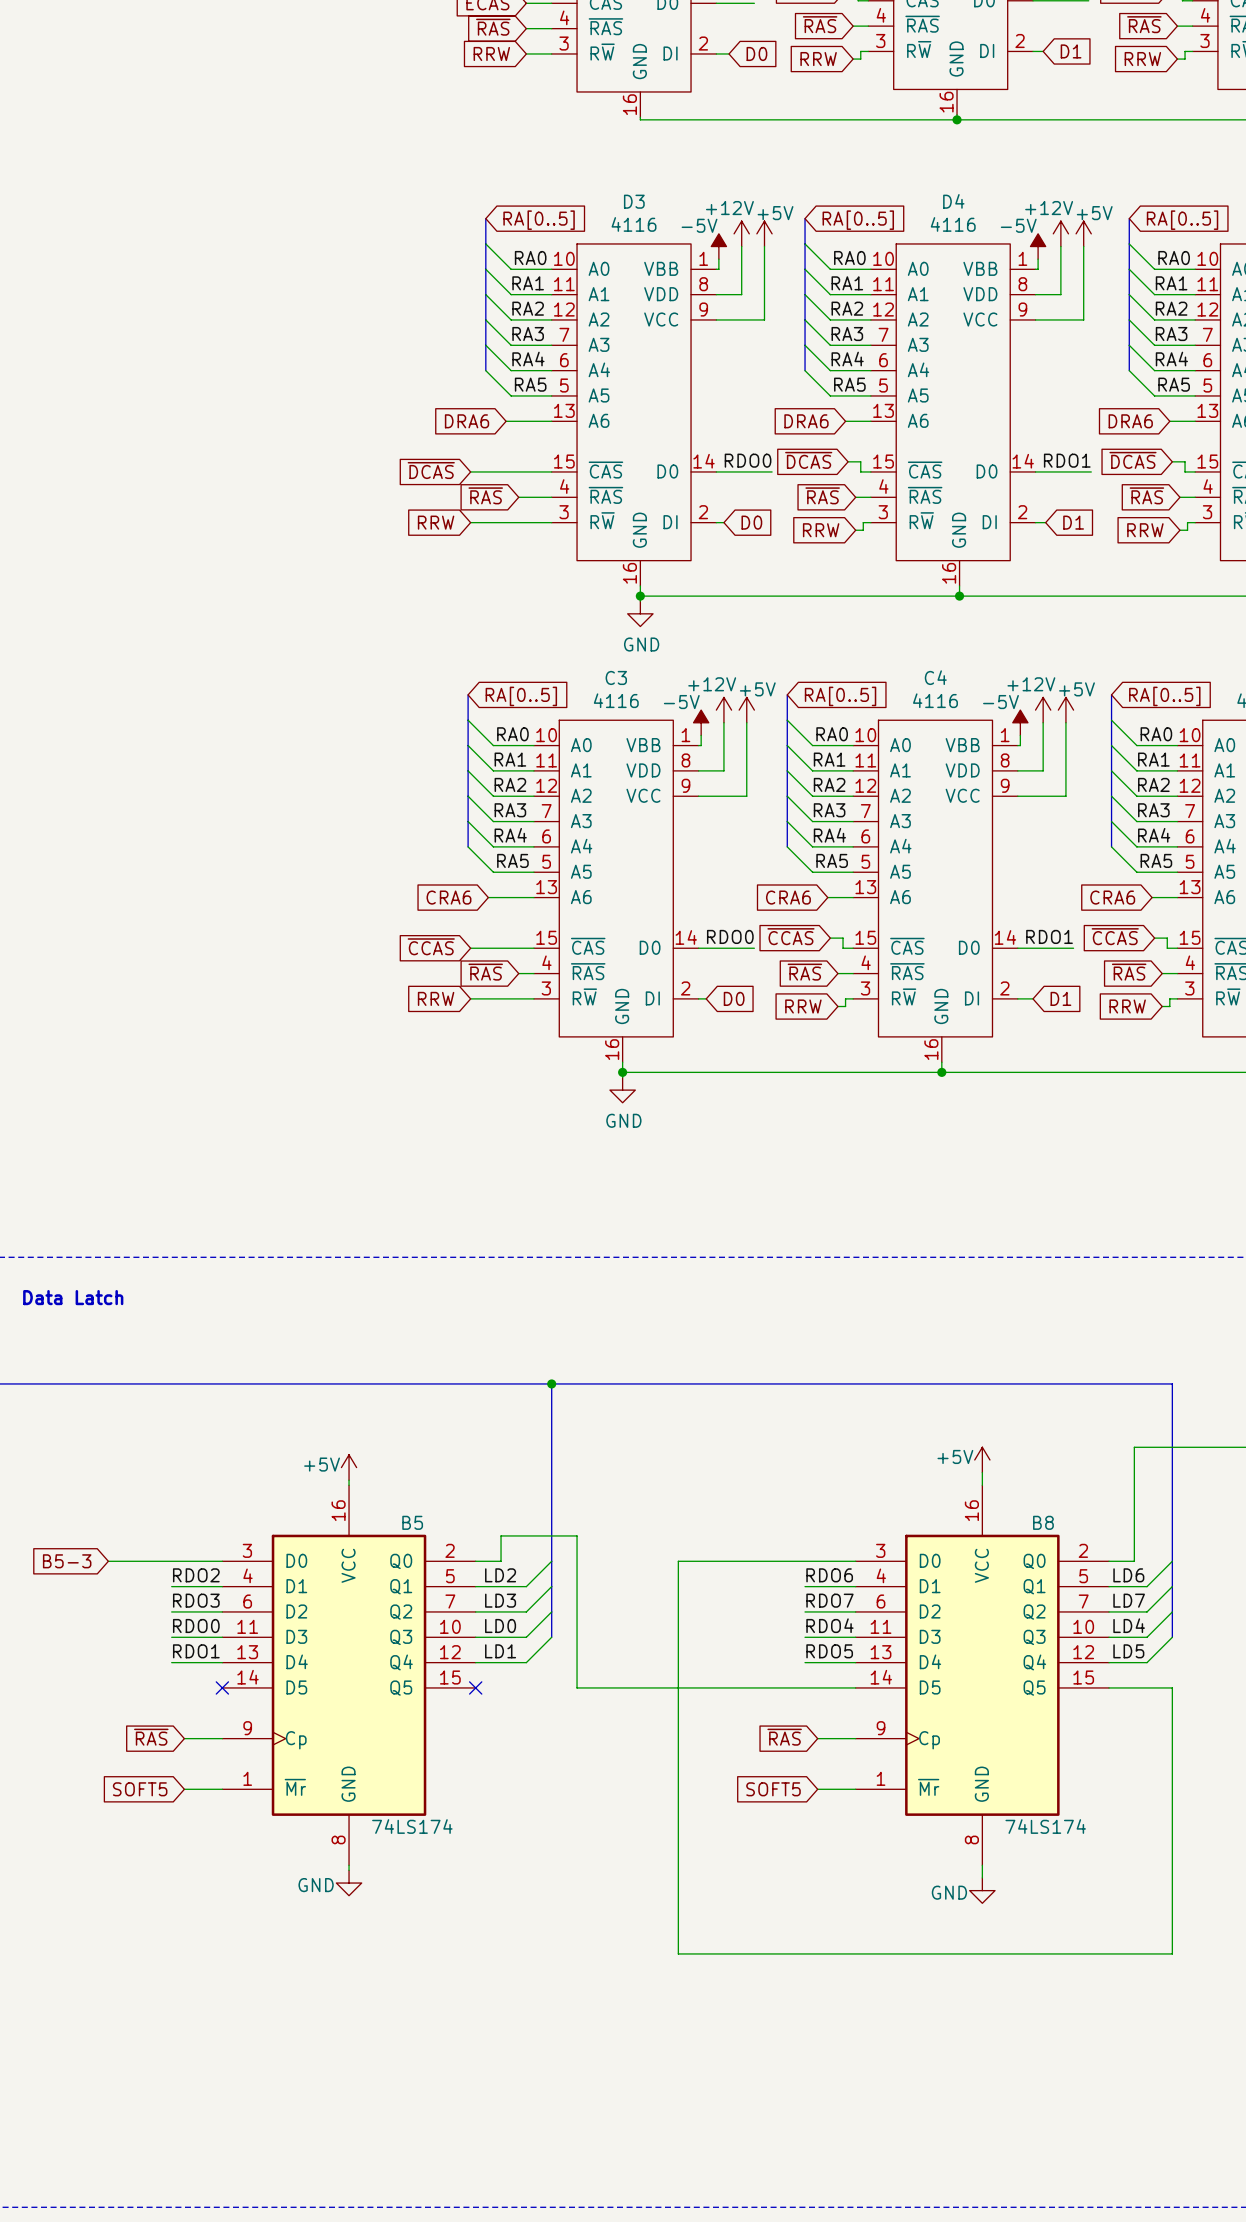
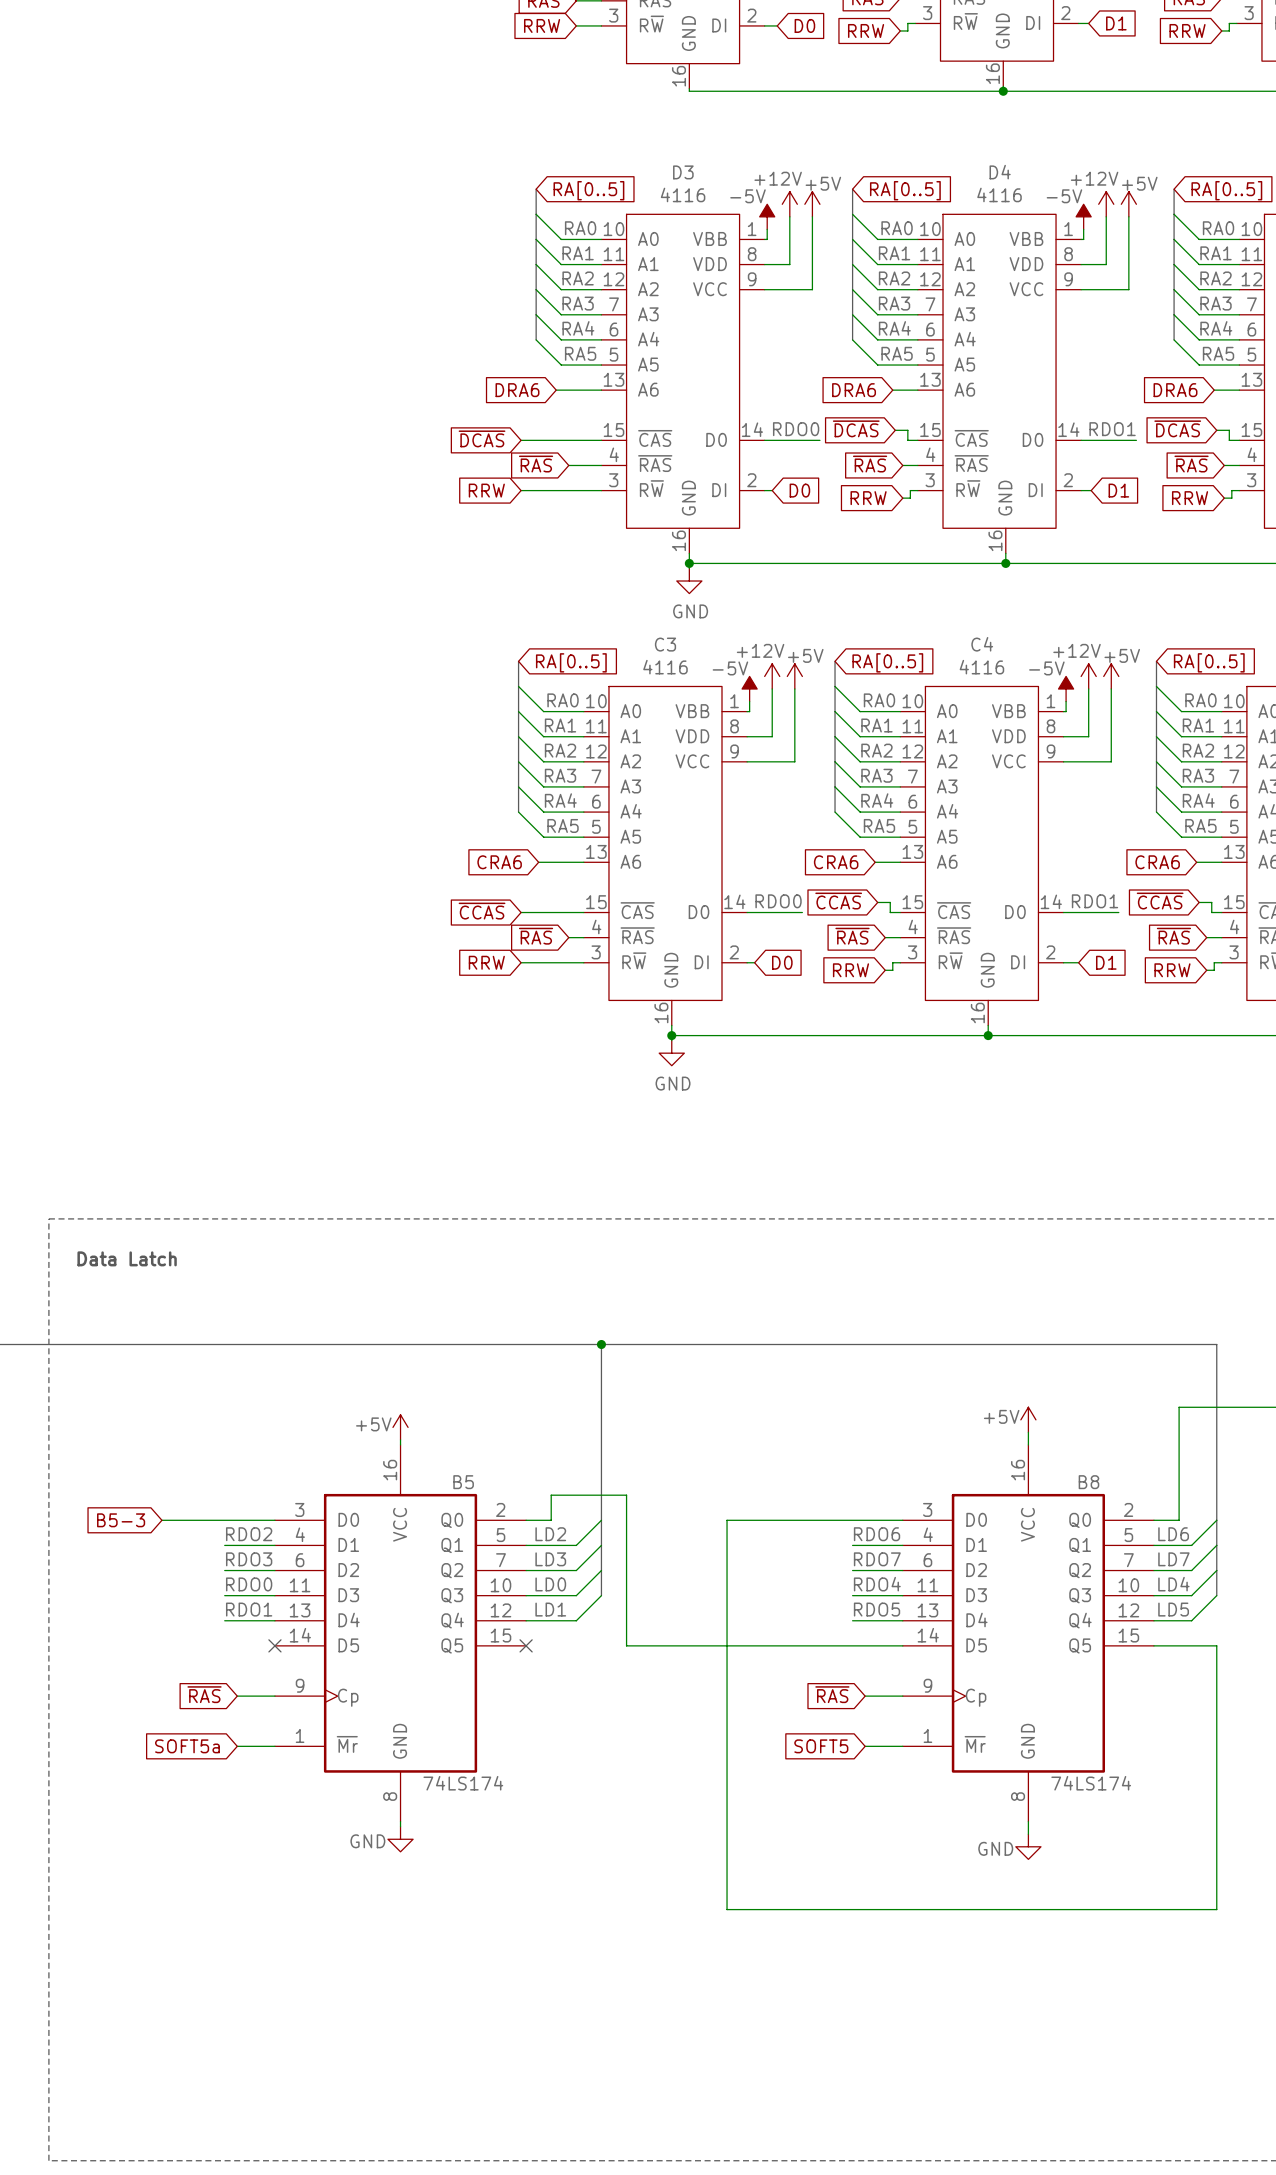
global label: SOFT5 (140, 1789) -> SOFT5a (187, 1746)

